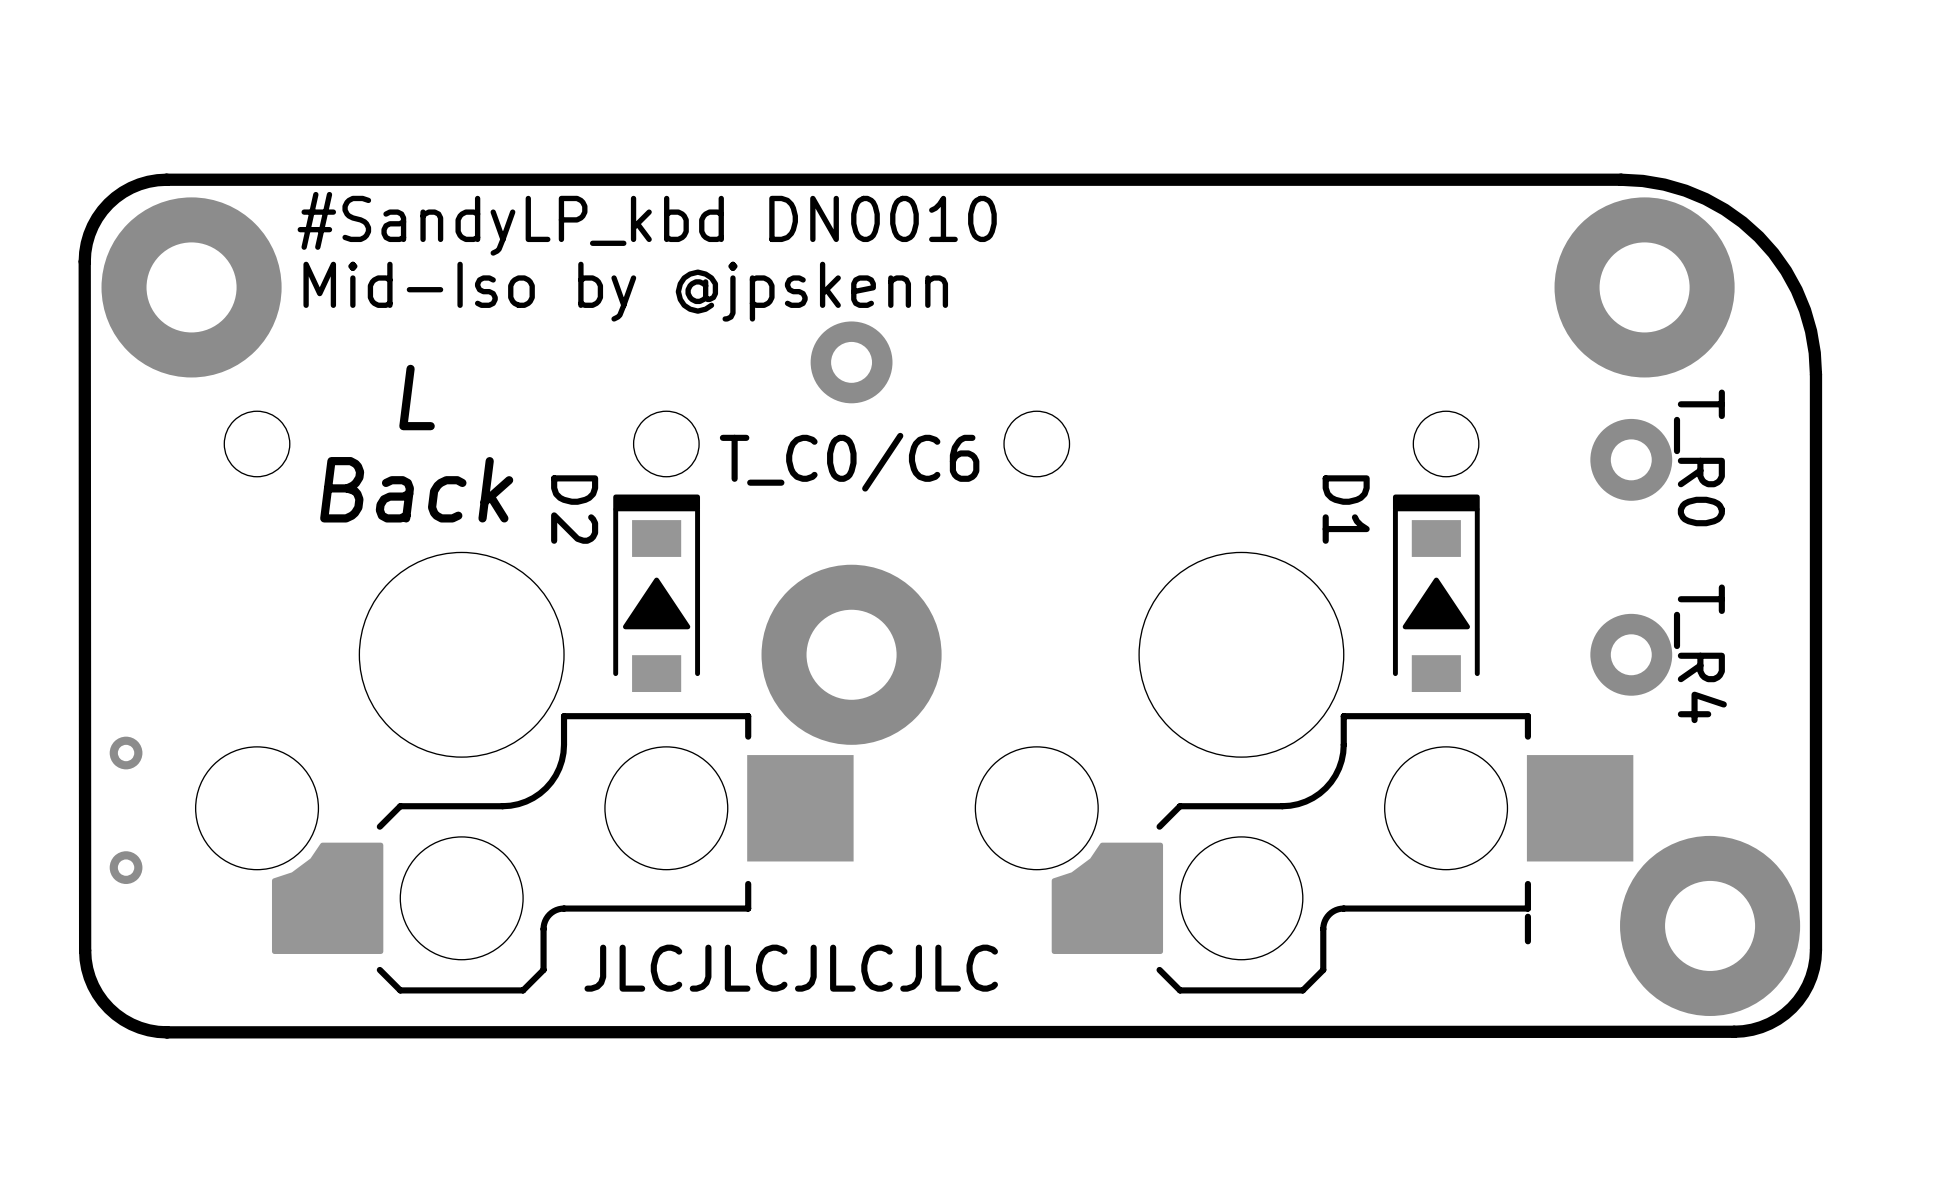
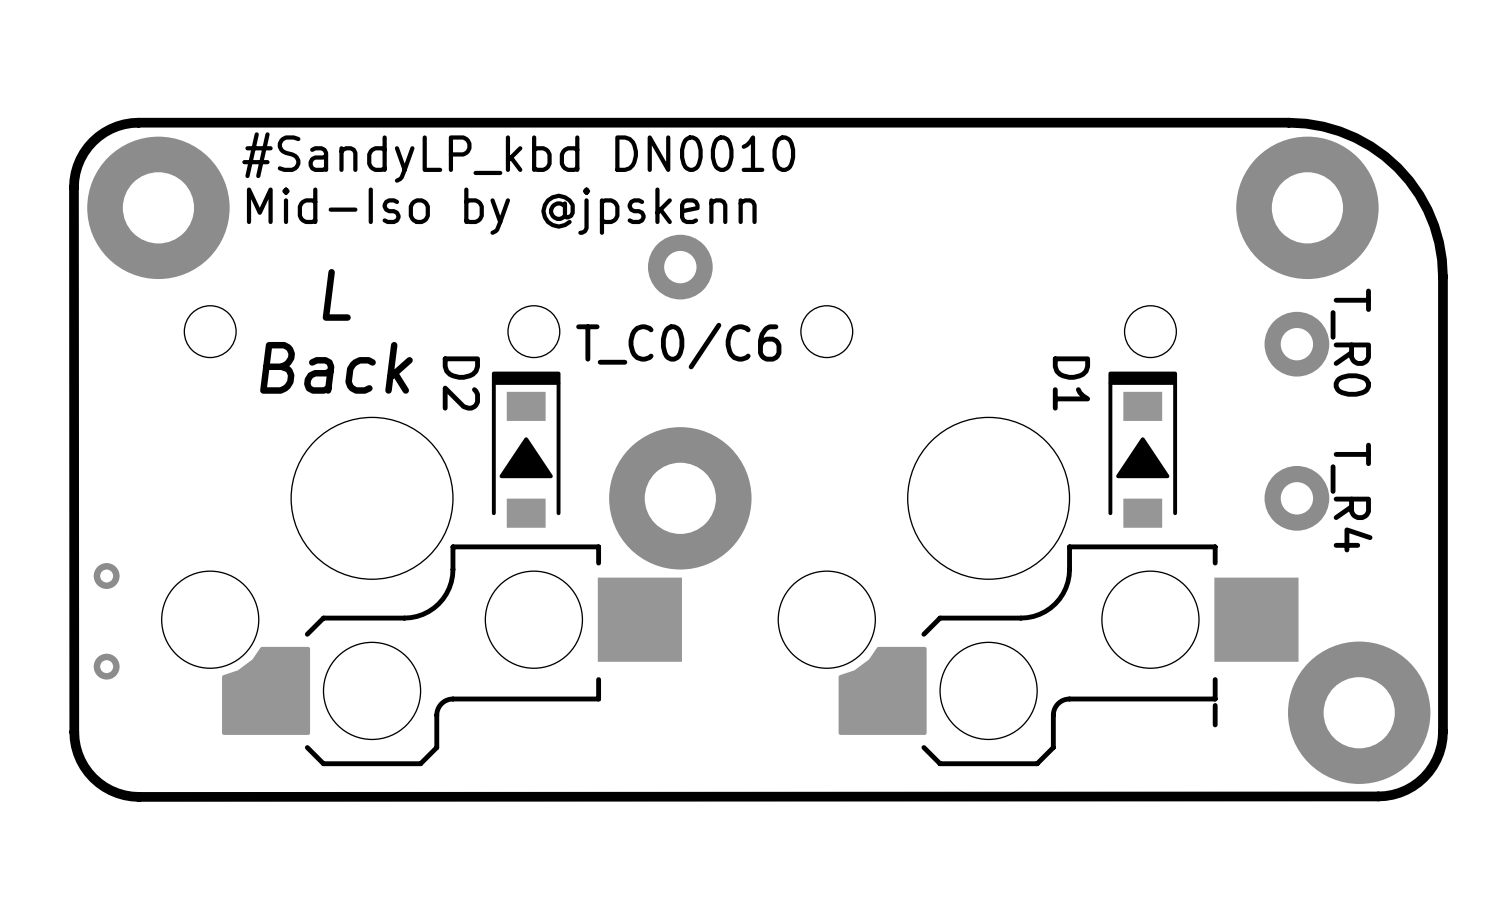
text: JLCJLCJLCJLC (791, 968) -> none

